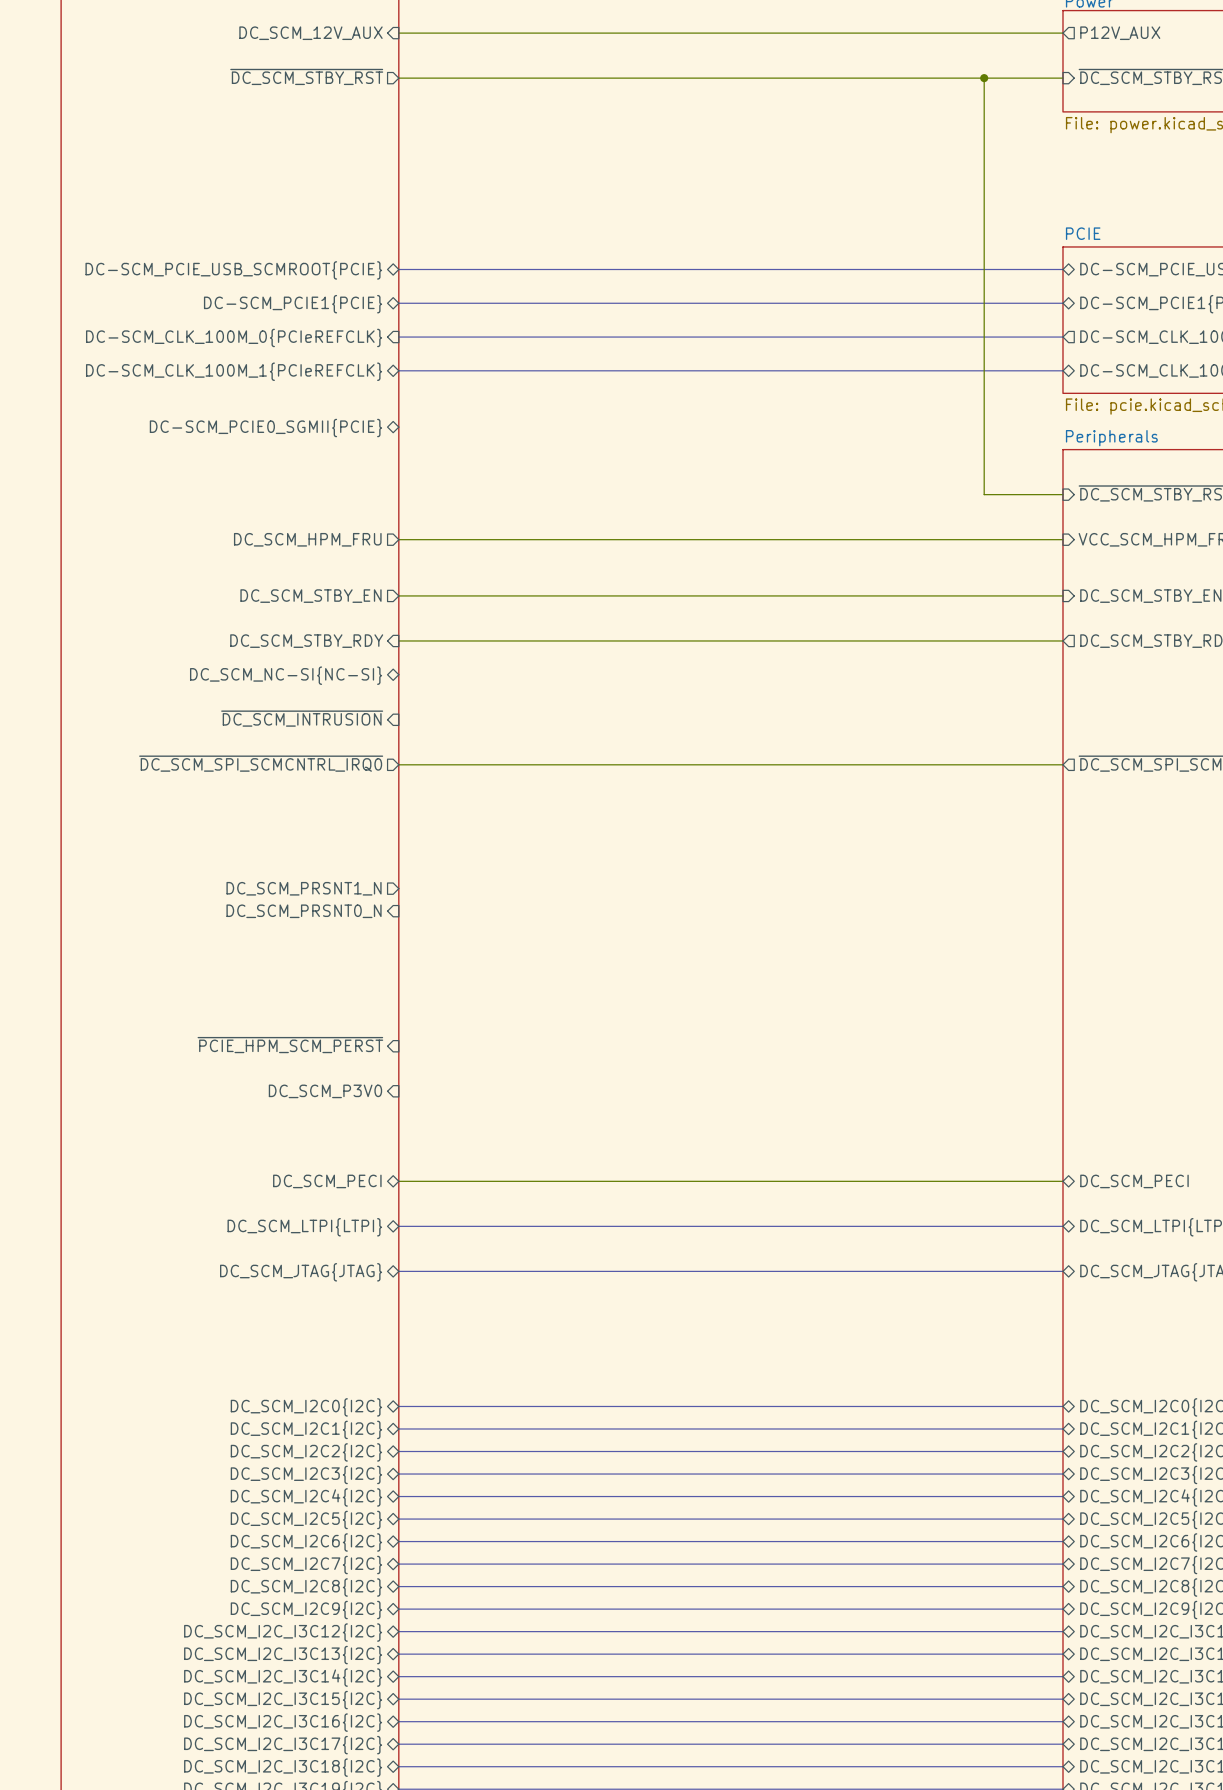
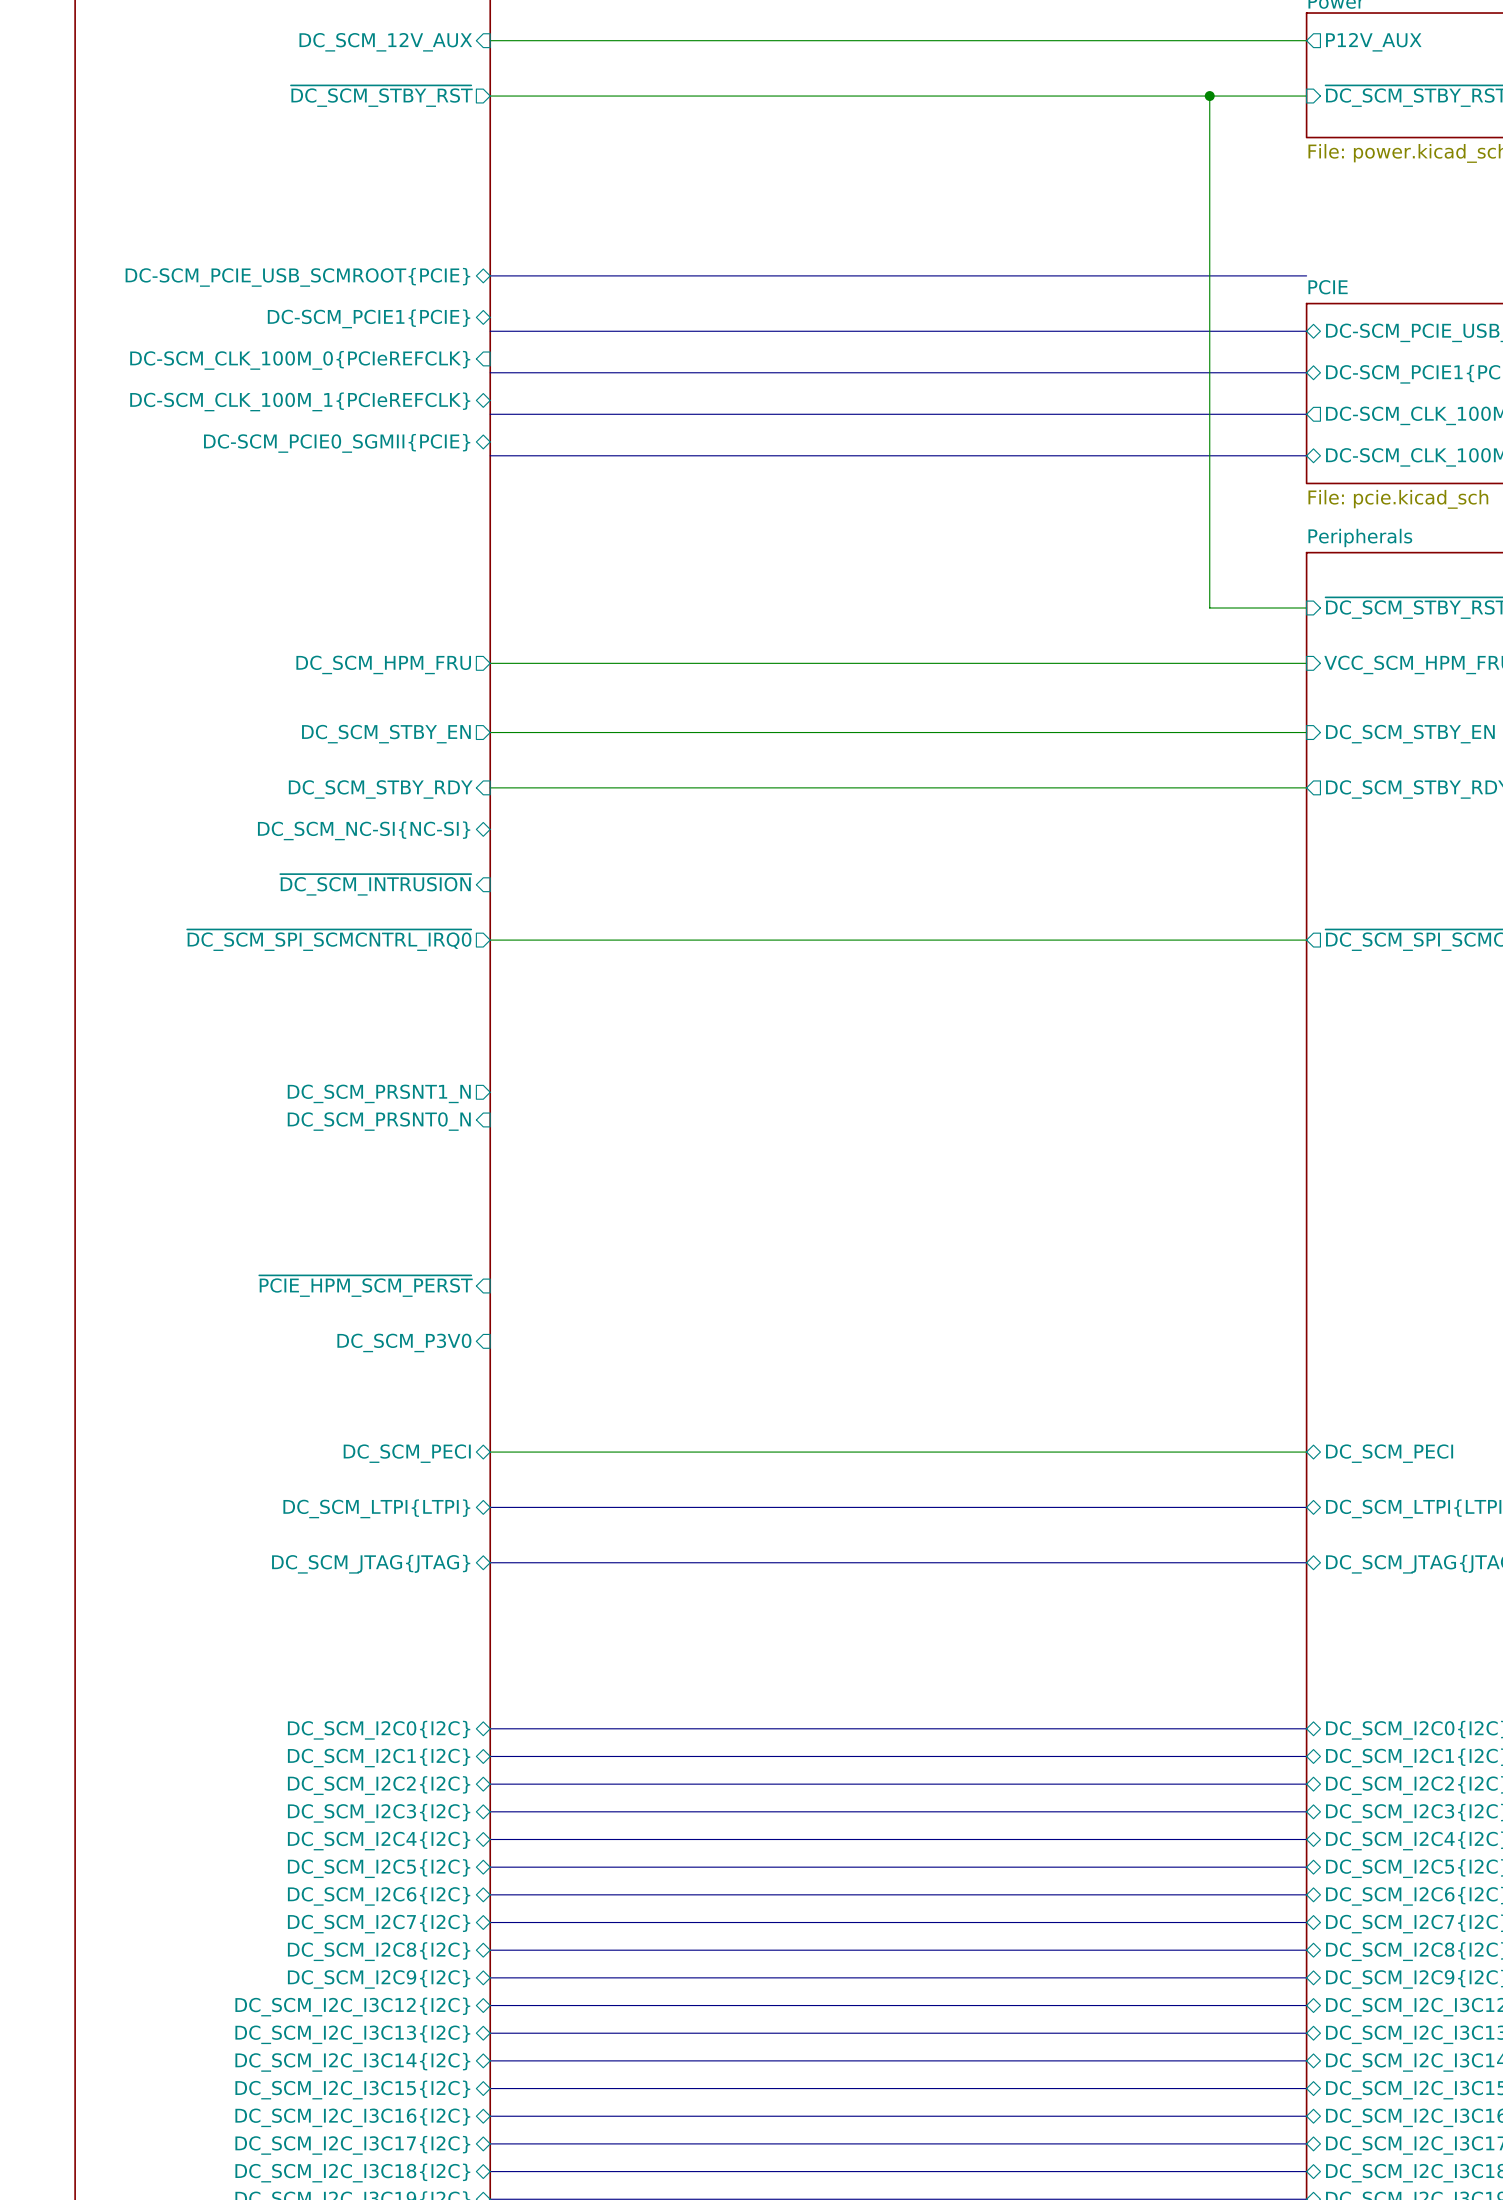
bus: none -> (490, 275) (1306, 275)
sheet pin position: DC-SCM_PCIE_USB_SCMROOT{PCIE} (233, 270) -> DC-SCM_PCIE_USB_SCMROOT{PCIE} (297, 277)
sheet pin position: DC-SCM_PCIE1{PCIE} (293, 304) -> DC-SCM_PCIE1{PCIE} (369, 318)
sheet pin position: DC-SCM_CLK_100M_0{PCIeREFCLK} (234, 337) -> DC-SCM_CLK_100M_0{PCIeREFCLK} (300, 360)
sheet pin position: DC-SCM_CLK_100M_1{PCIeREFCLK} (234, 371) -> DC-SCM_CLK_100M_1{PCIeREFCLK} (300, 401)
sheet pin position: DC-SCM_PCIE0_SGMII{PCIE} (265, 428) -> DC-SCM_PCIE0_SGMII{PCIE} (337, 443)

